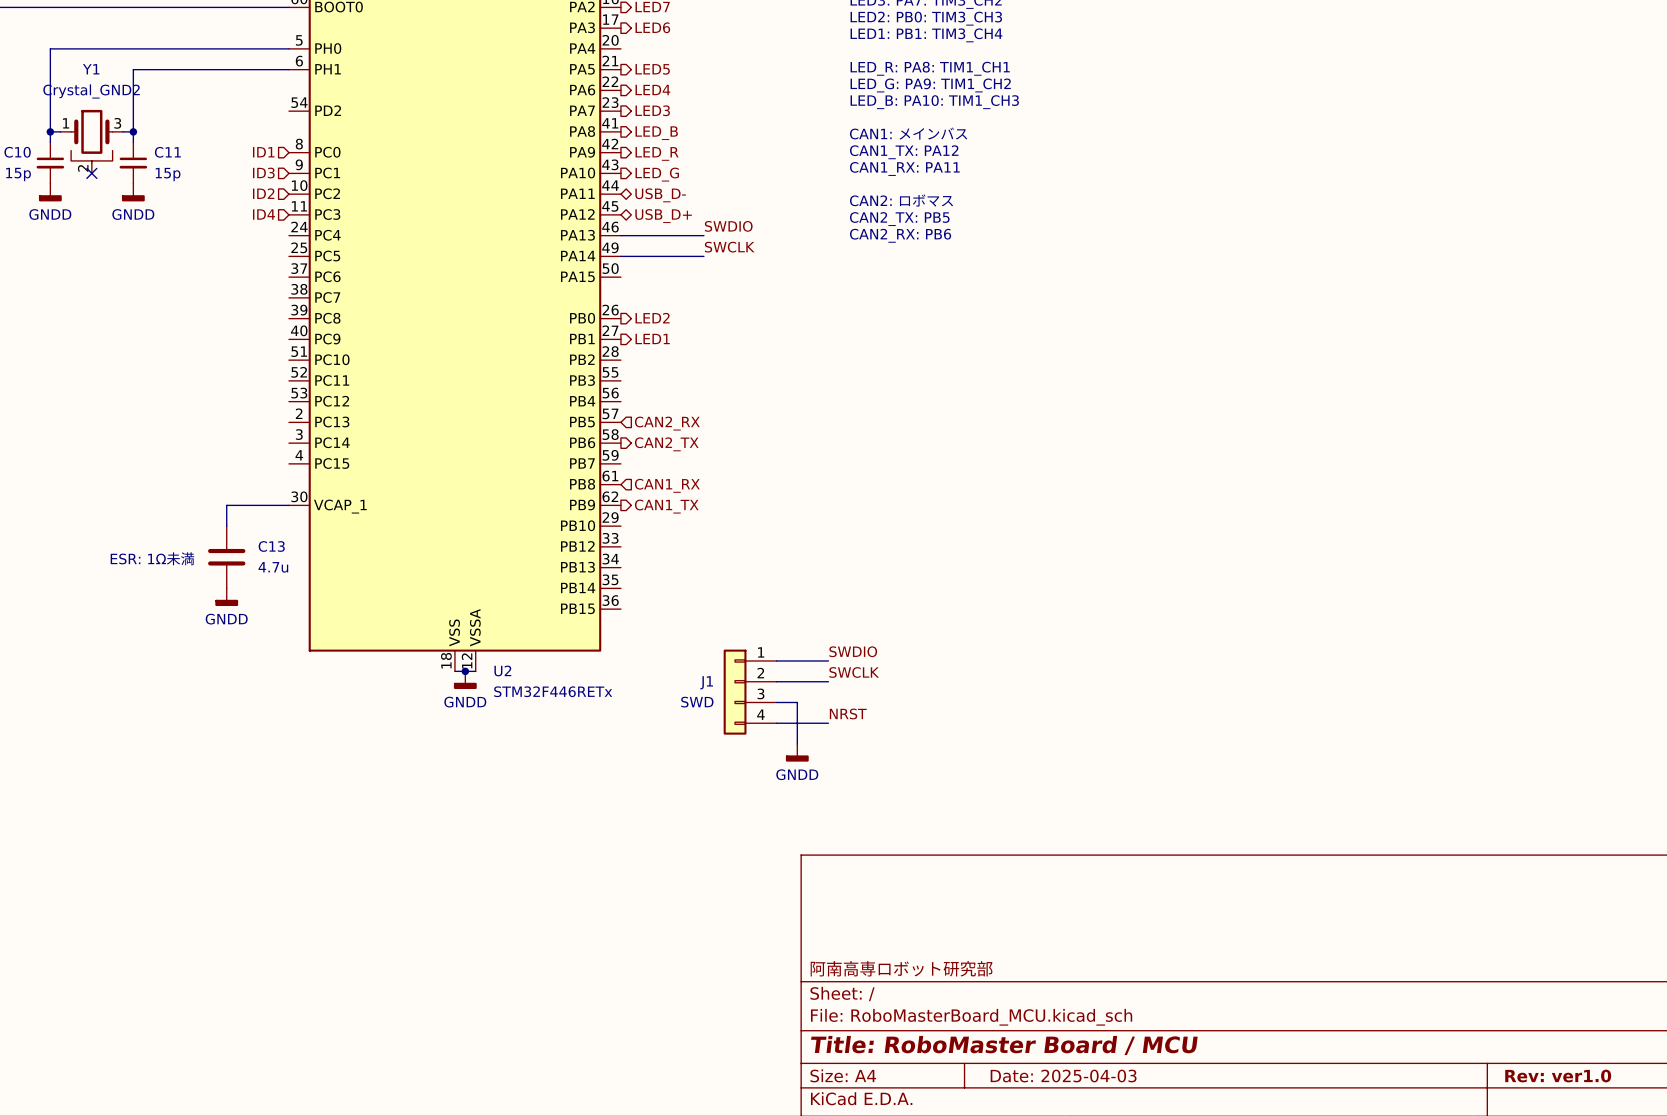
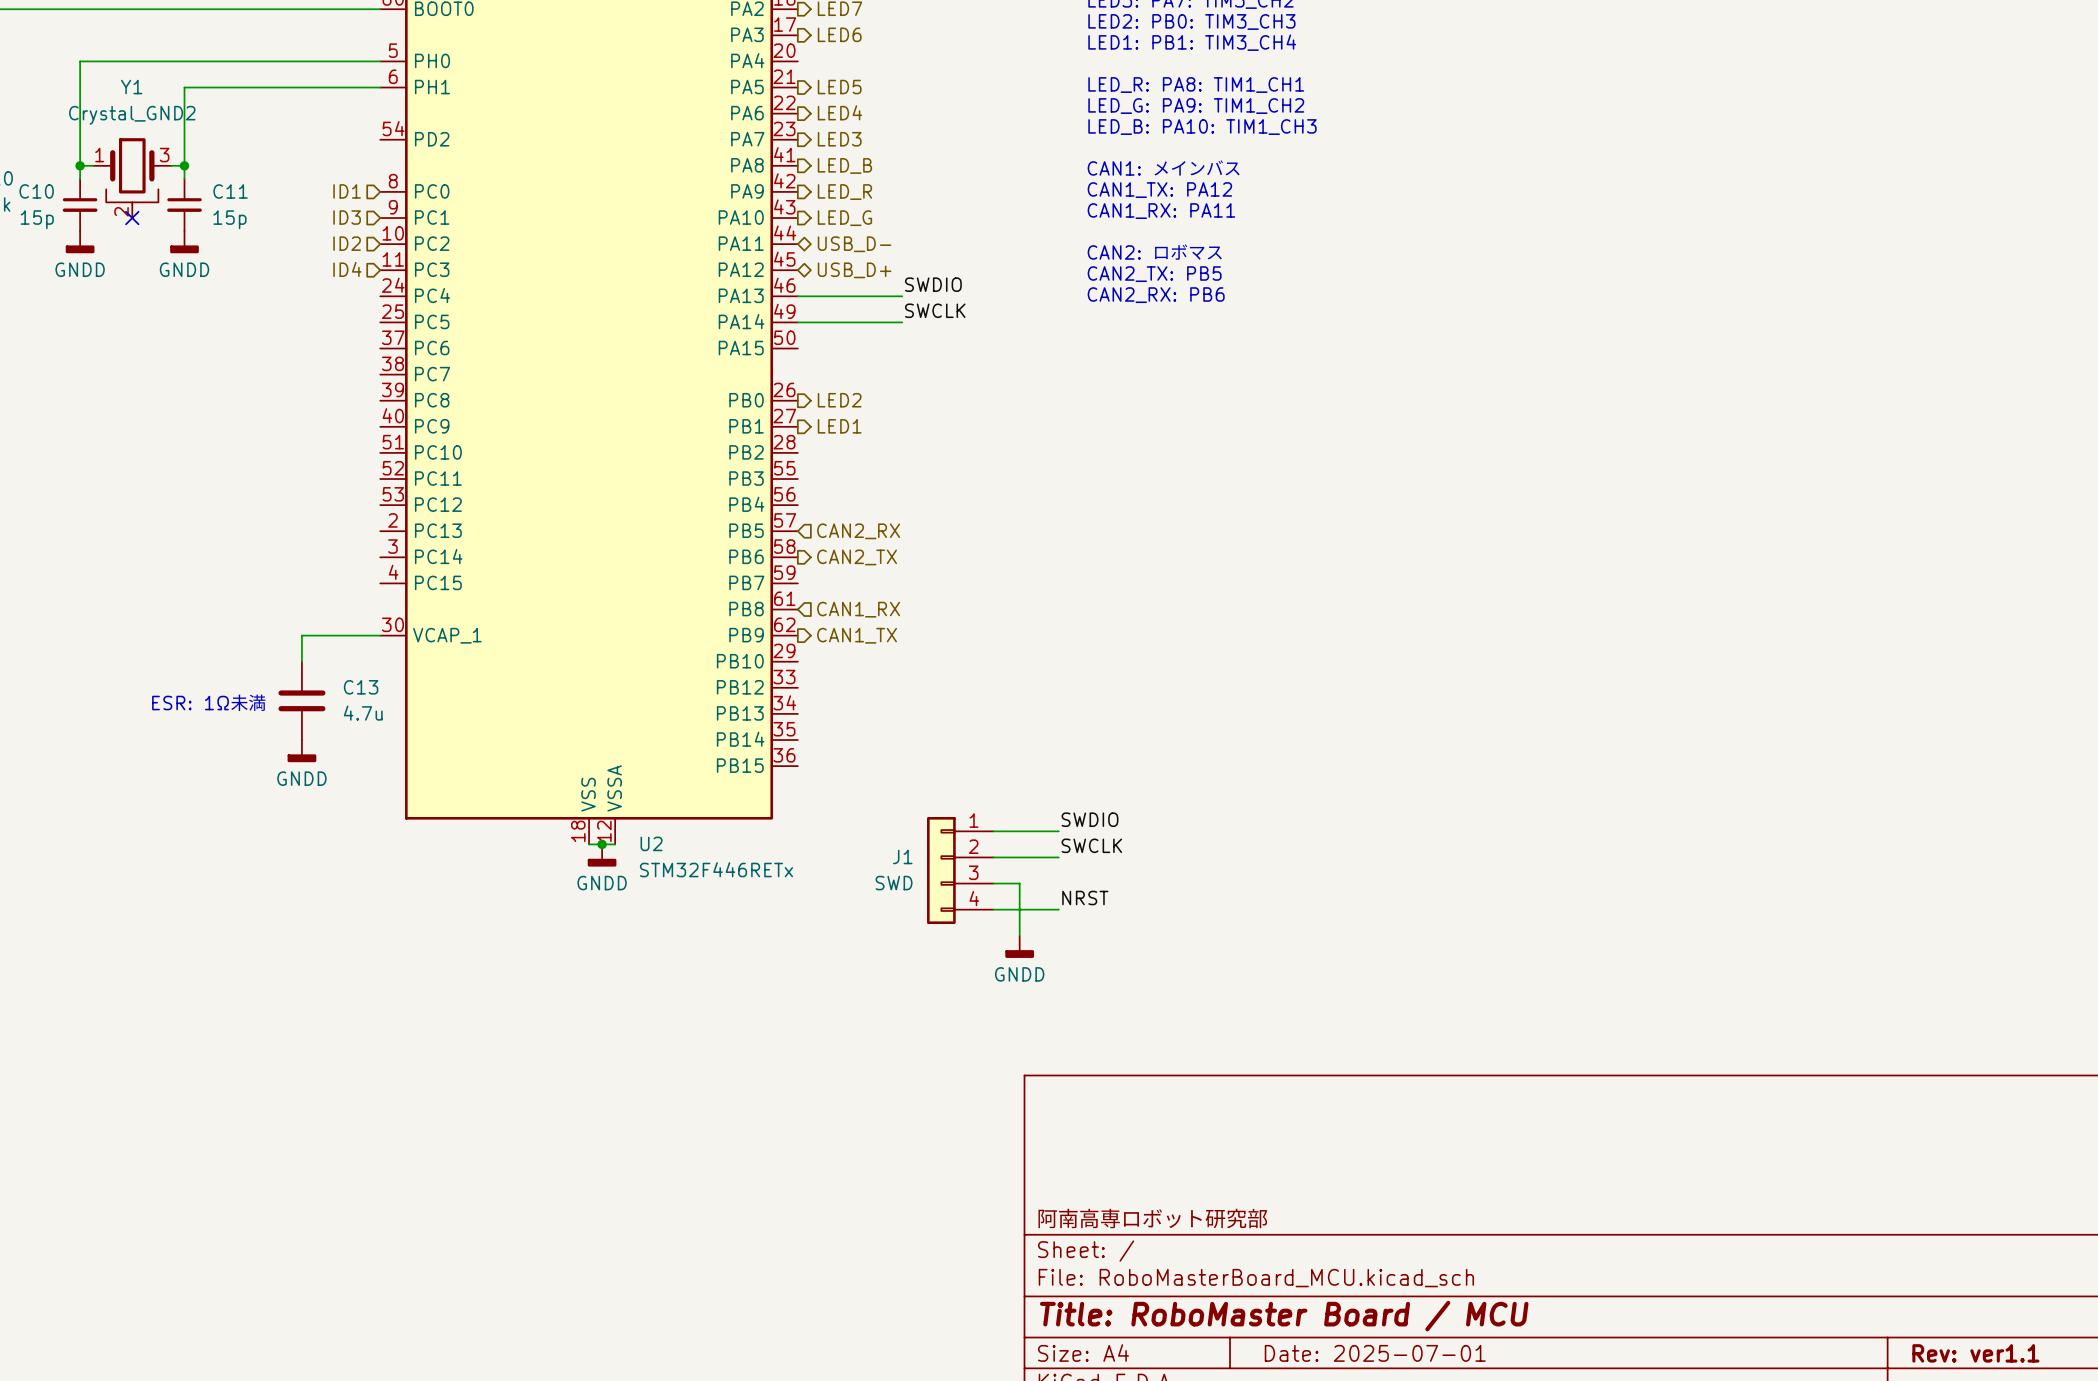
title block: Date: 2025-04-03 (1063, 1076) -> Date: 2025-07-01 (1375, 1353)
title block: Rev: ver1.0 (1558, 1076) -> Rev: ver1.1 (1975, 1353)

